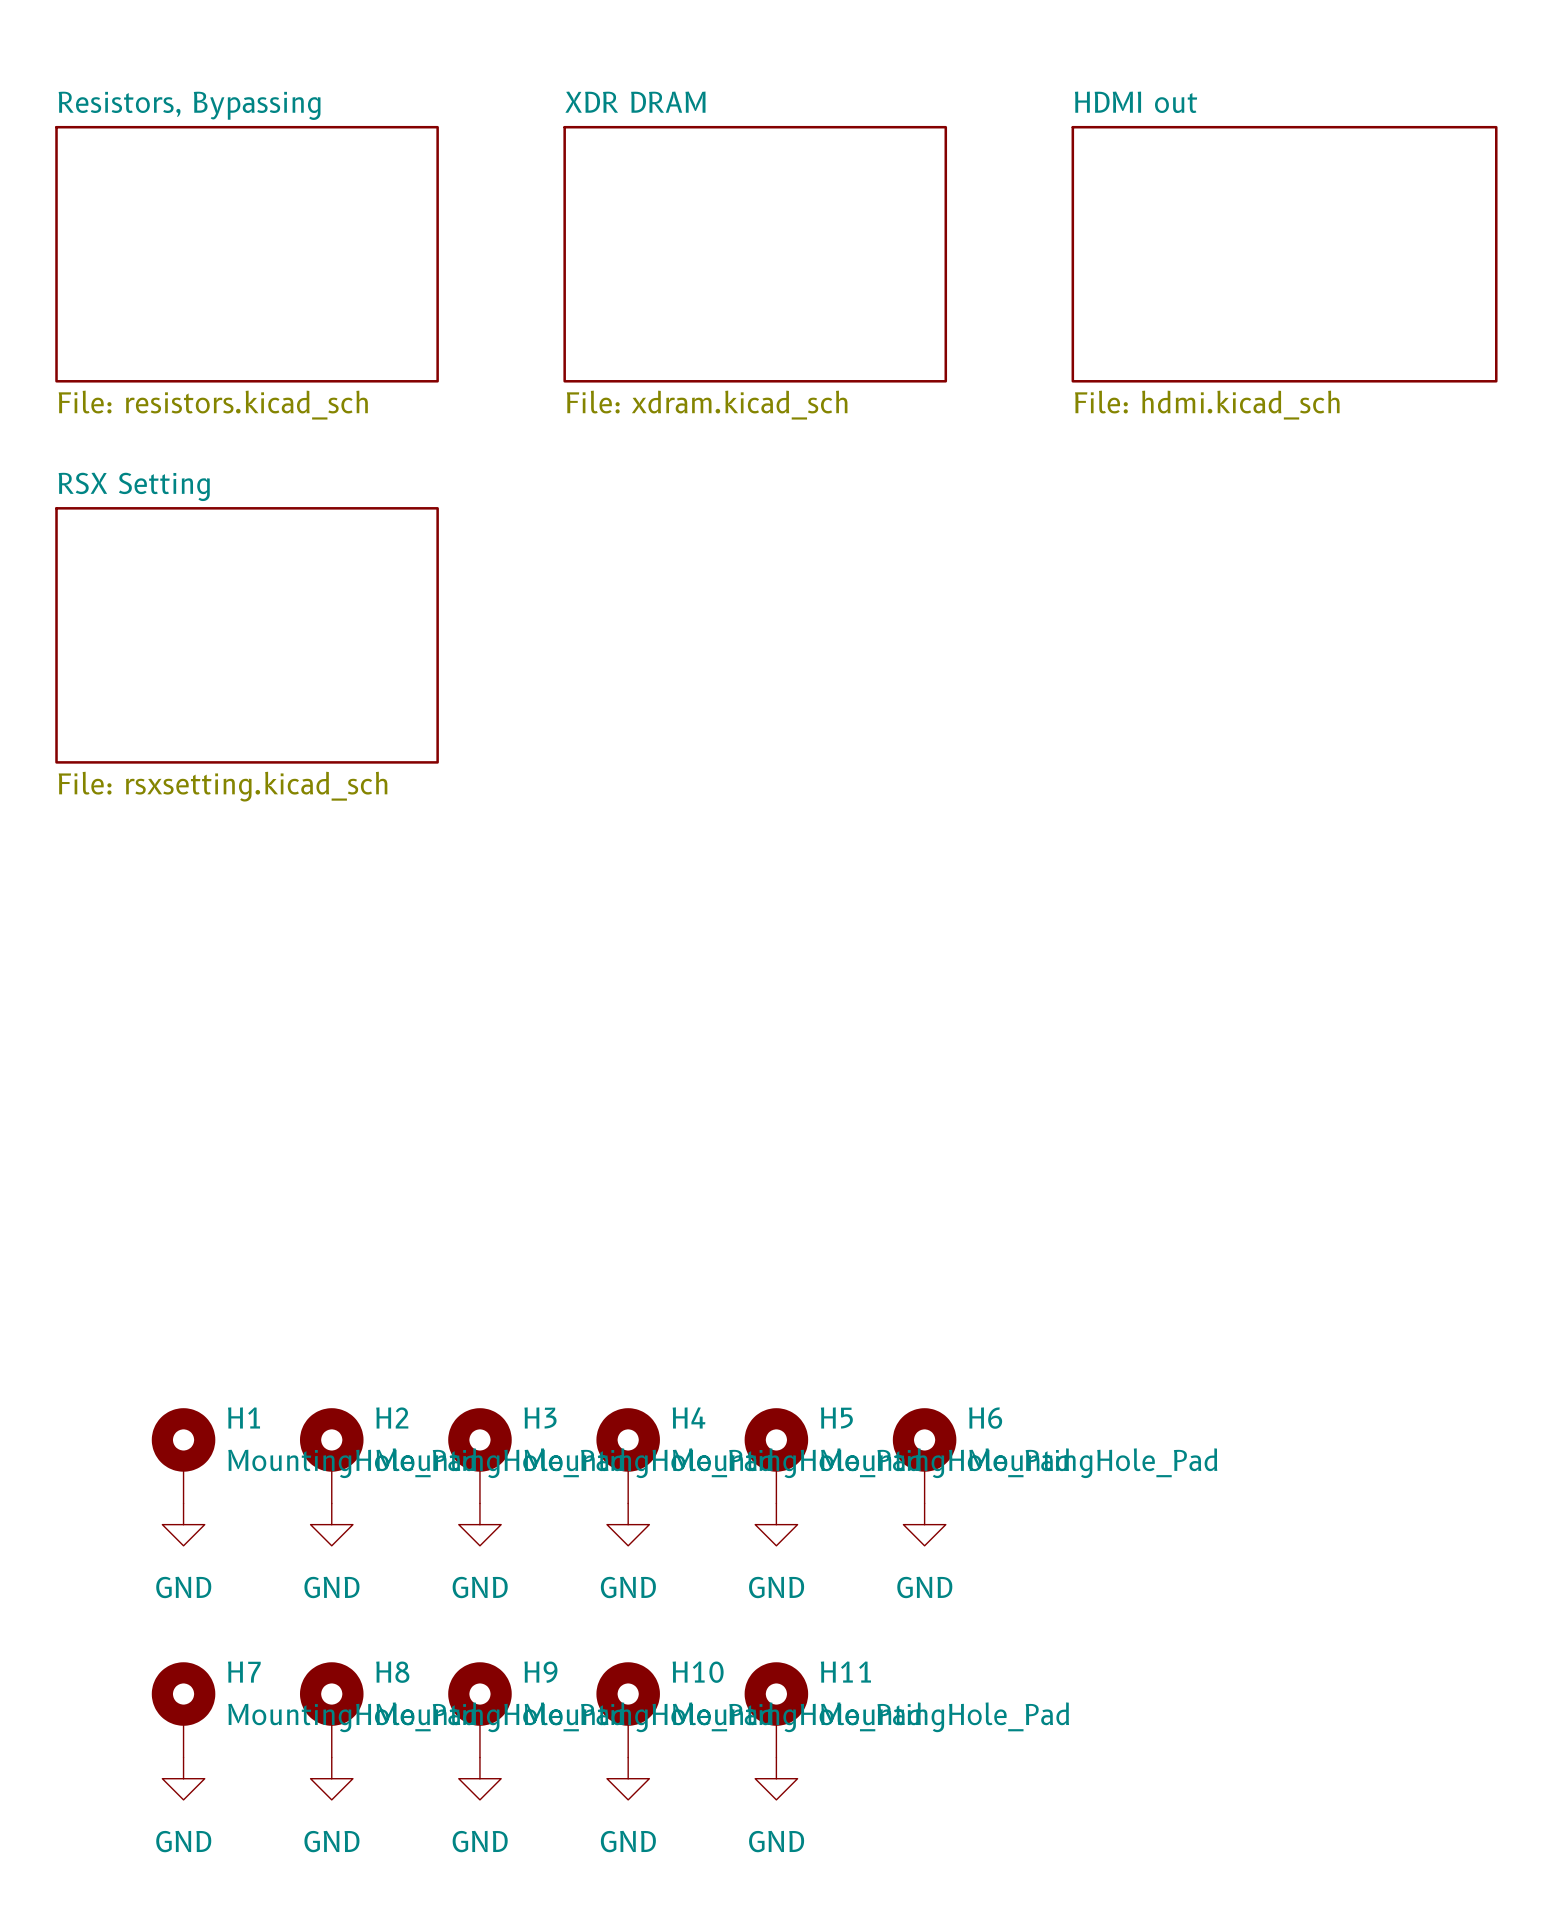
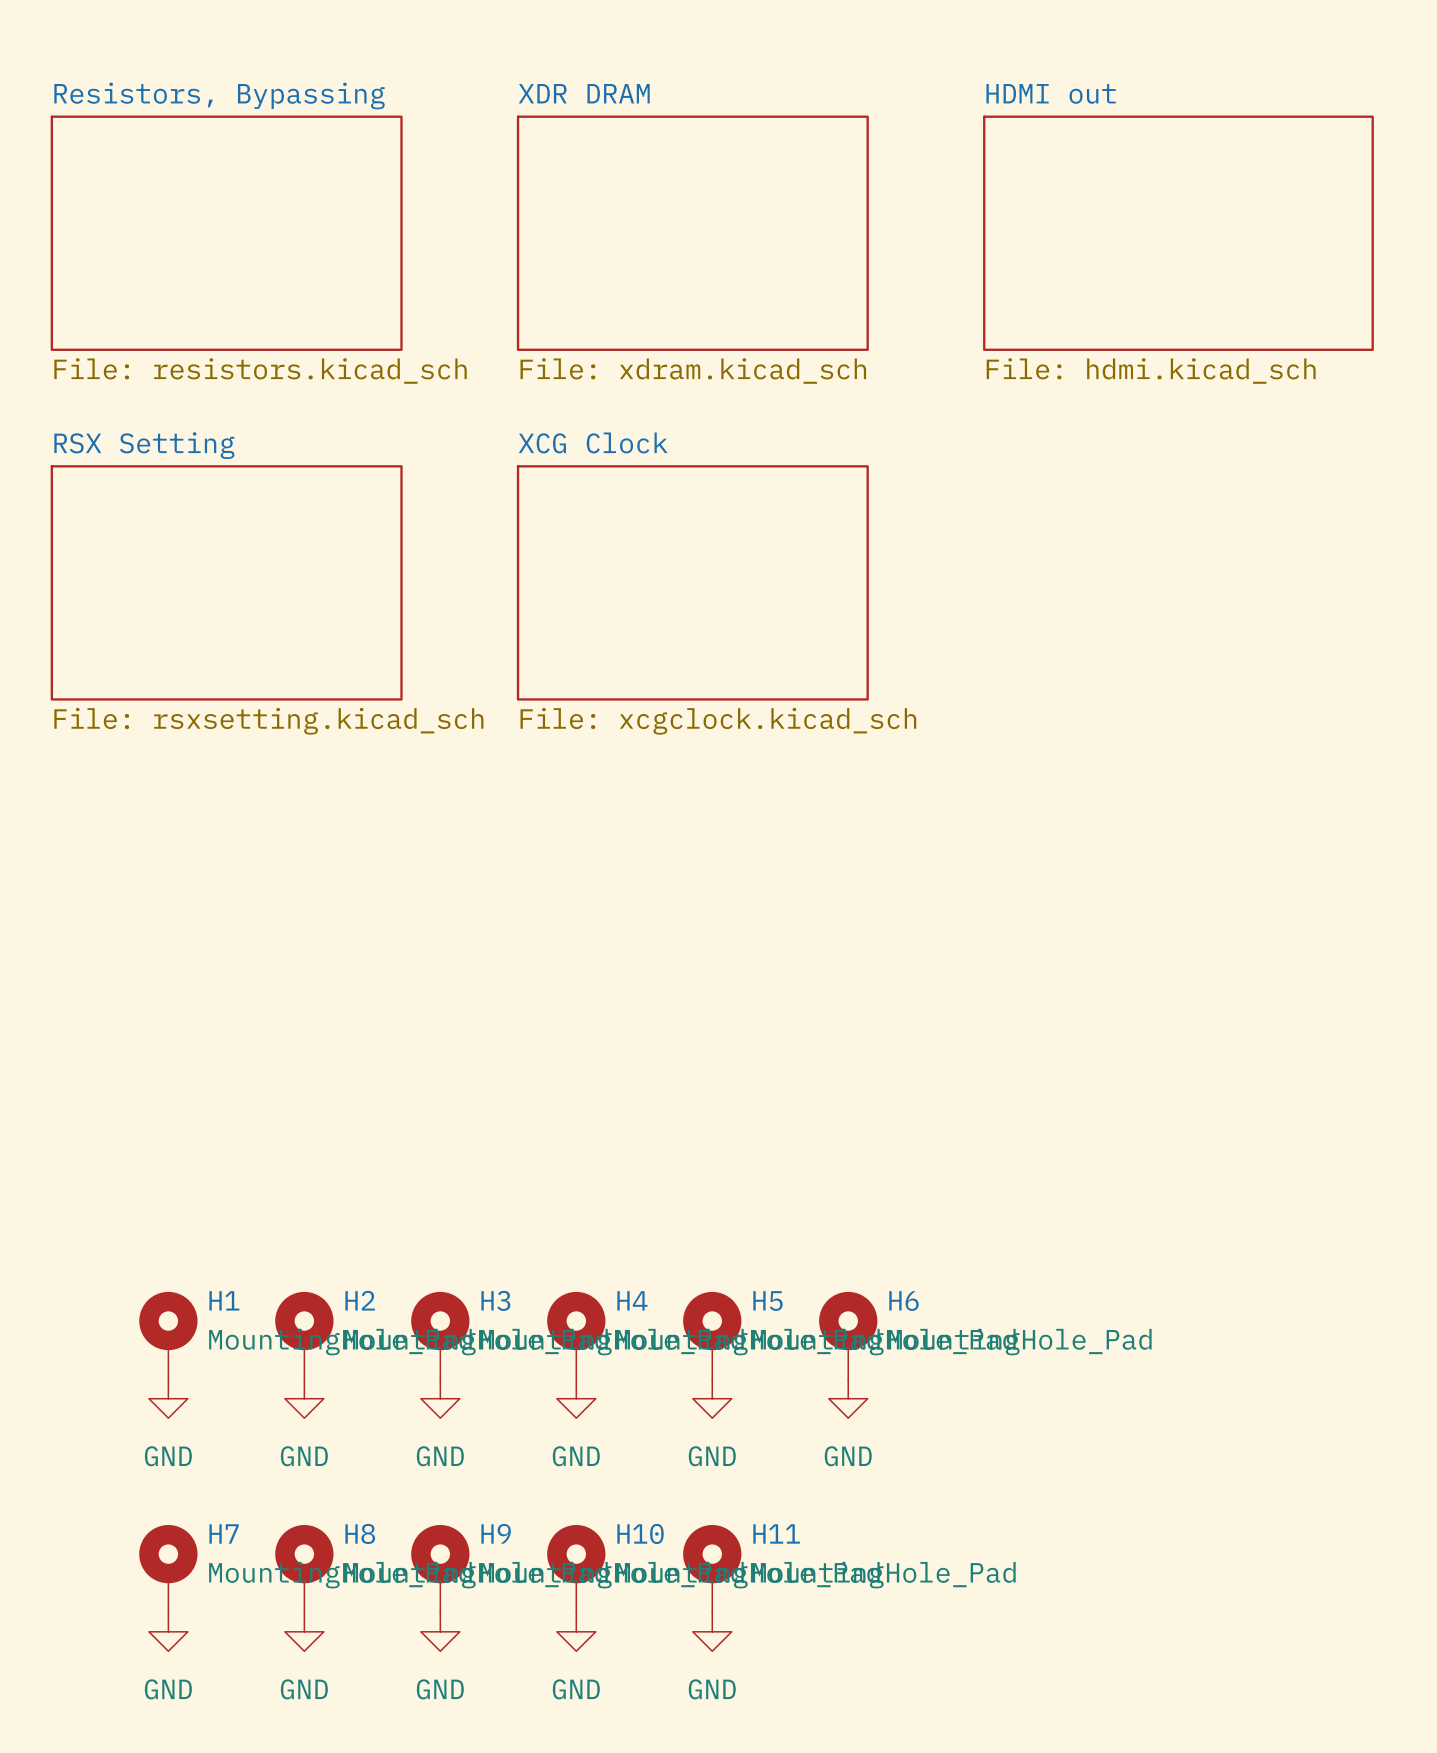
sheet XCG Clock: none -> File: xcgclock.kicad_sch (692, 582)

